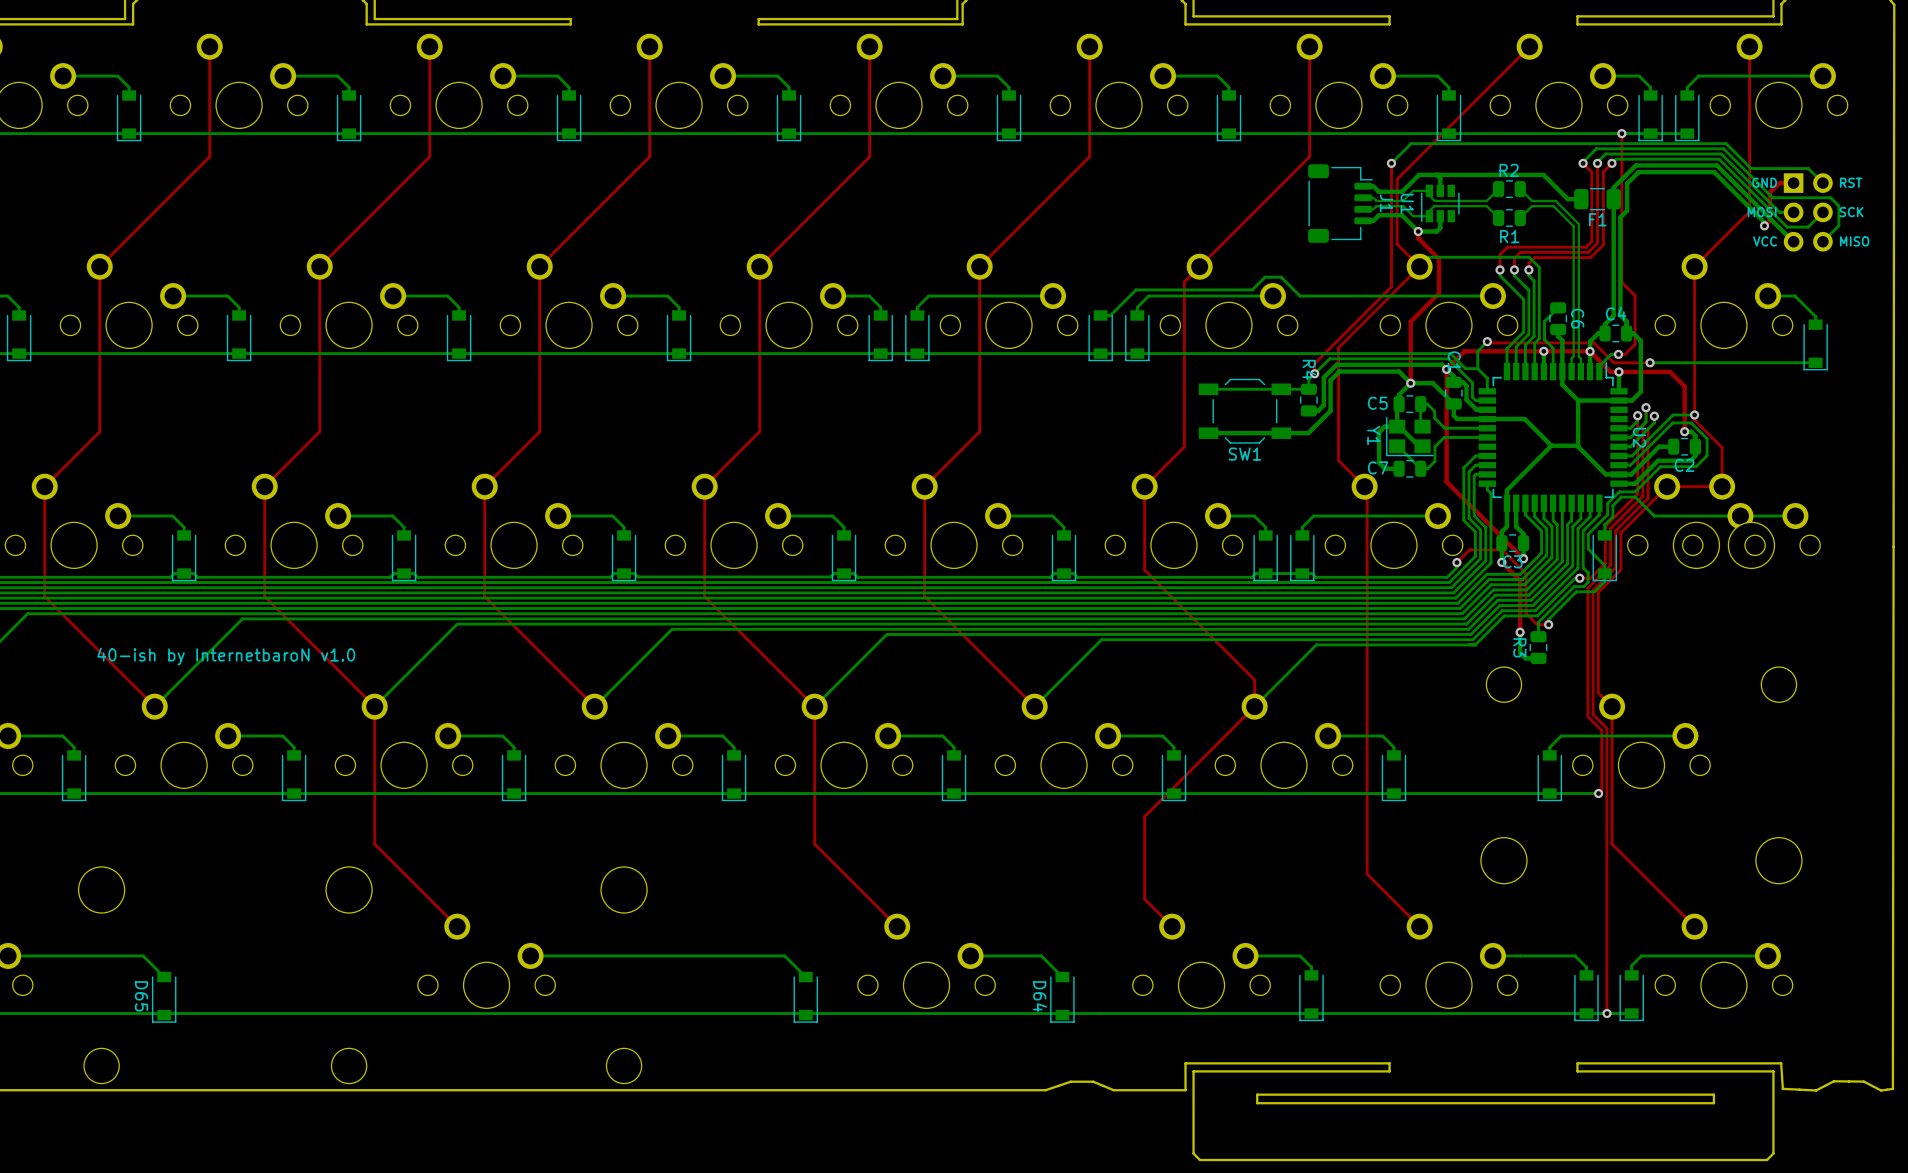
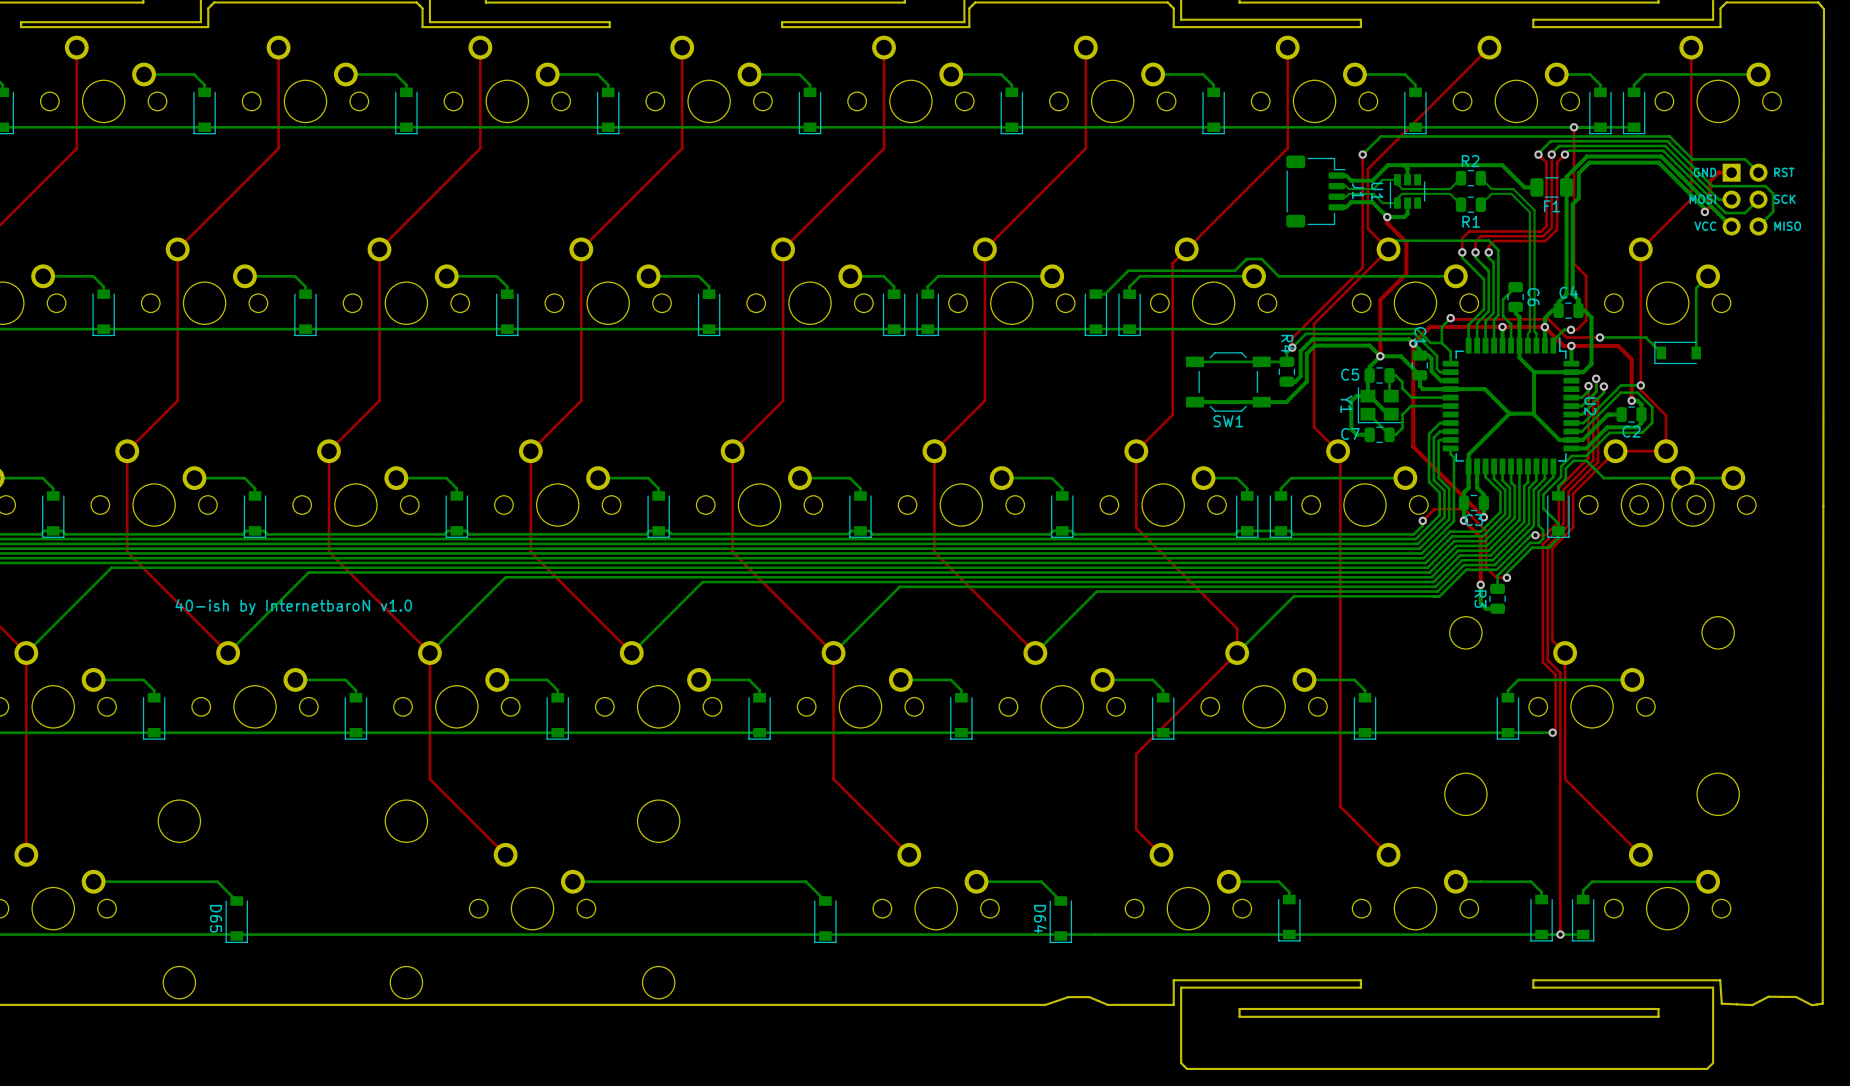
bottom track: (1767, 296) (1795, 296) (1815, 316) (1815, 324) -> (1708, 276) (1696, 288) (1696, 352)
part rotation: 0° (1815, 344) -> 90° clockwise (1677, 352)
part position: (1815, 344) -> (1677, 352)
bottom track: (1815, 362) (1700, 362) -> (1661, 352) (1646, 337)

